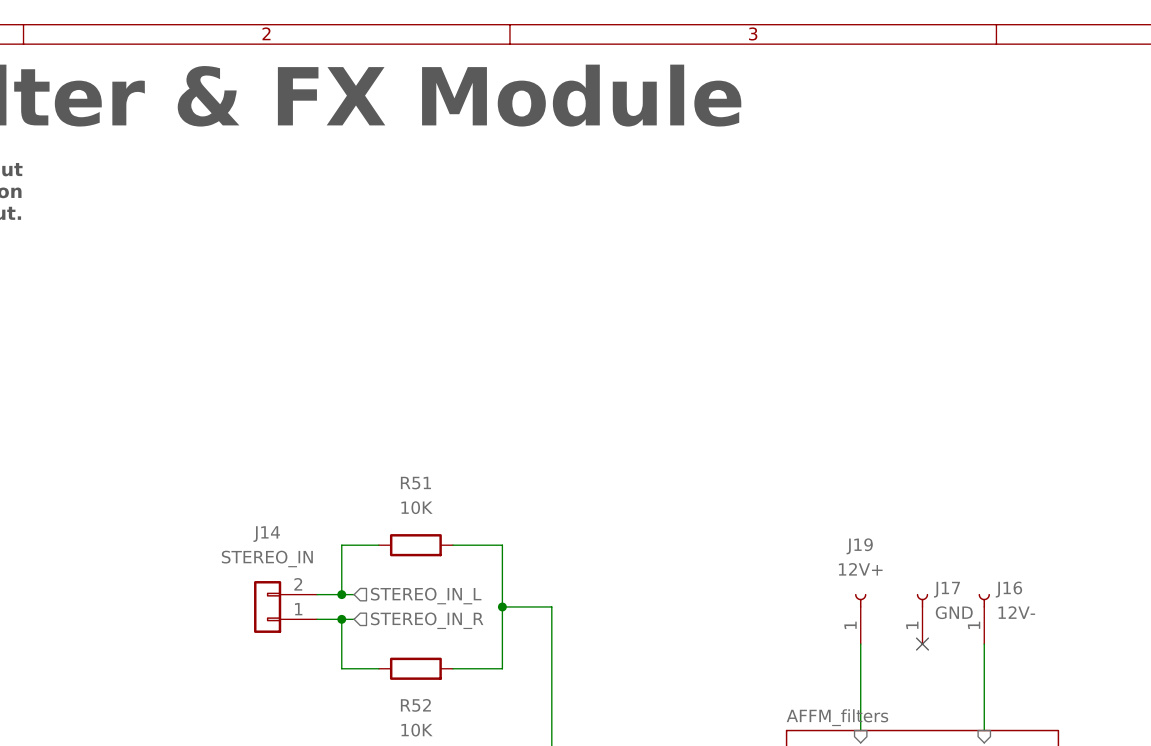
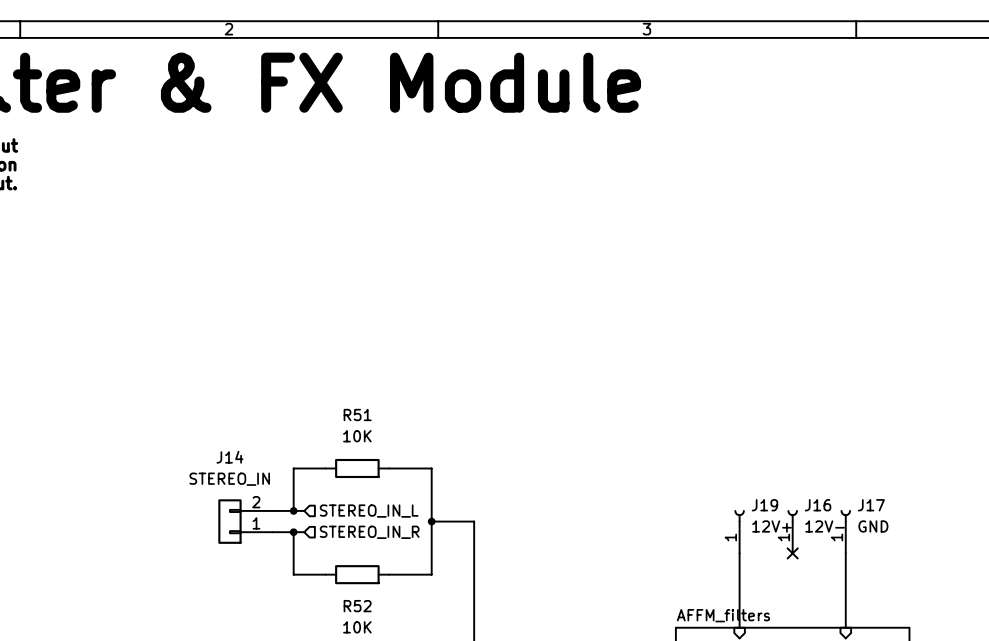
J19 name position: J19 (859, 546) -> J19 (764, 505)
J19 value position: 12V+ (860, 569) -> 12V+ (772, 526)
J17 name: J17 (946, 589) -> J16 (818, 505)
J16 name: J16 (1008, 589) -> J17 (871, 505)
J17 value: GND (954, 612) -> 12V- (825, 526)
J16 value: 12V- (1016, 612) -> GND (873, 526)

